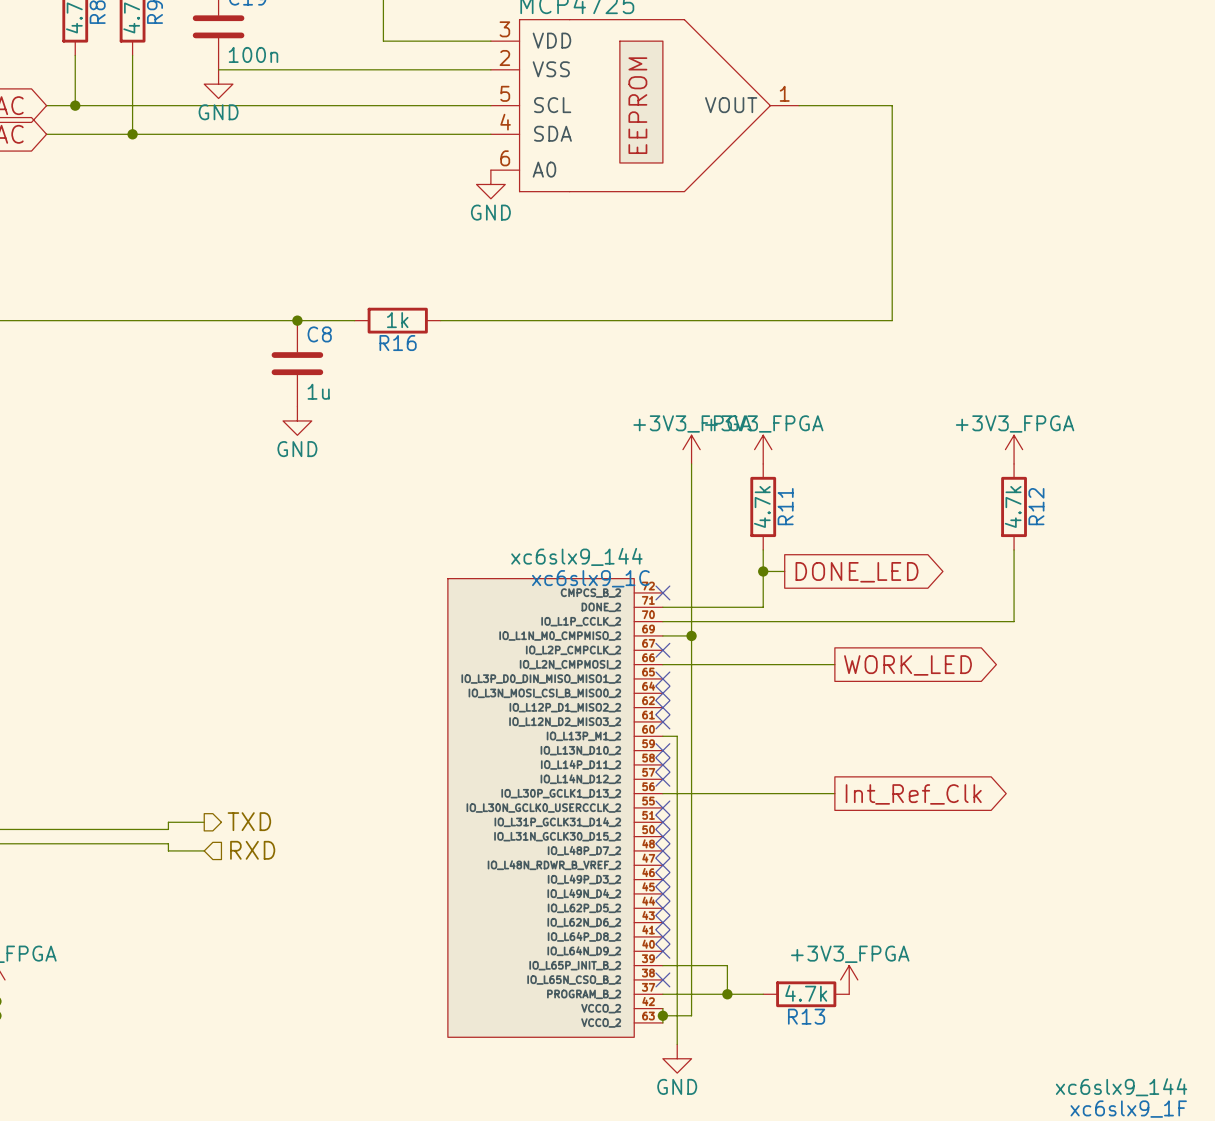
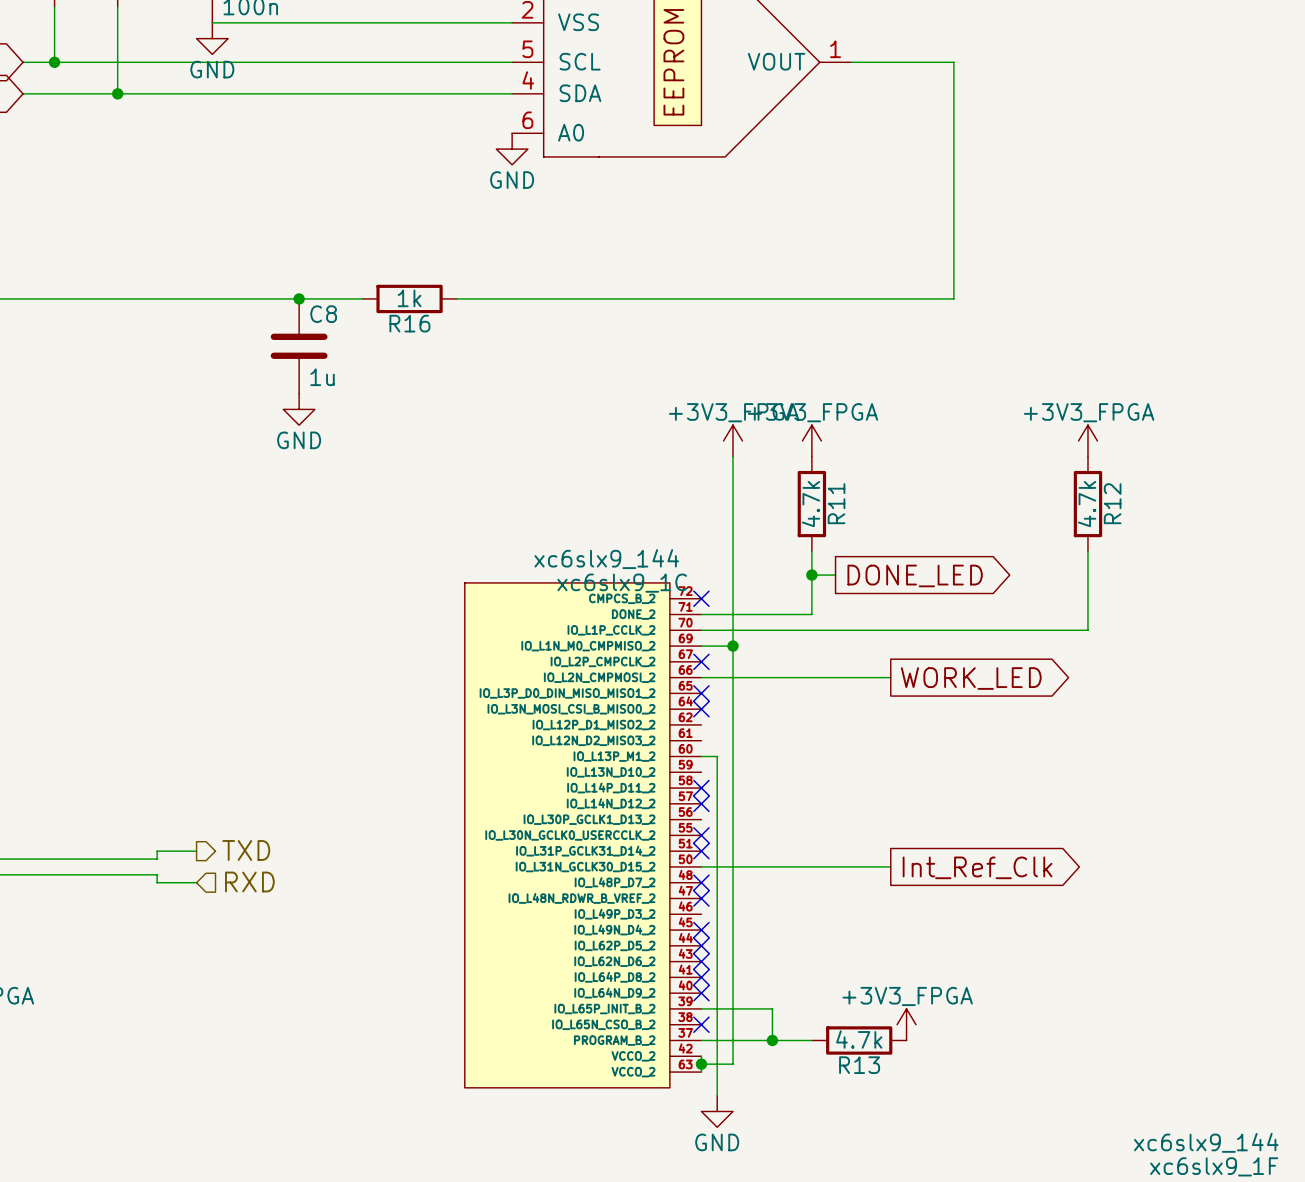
no-connect mark: (662, 707) -> none
no-connect mark: (662, 721) -> none
no-connect mark: (662, 750) -> none
wire: (662, 793) (834, 793) -> (701, 866) (890, 866)
global label position: Int_Ref_Clk (913, 794) -> Int_Ref_Clk (977, 867)
no-connect mark: (662, 836) -> none
no-connect mark: (662, 879) -> none

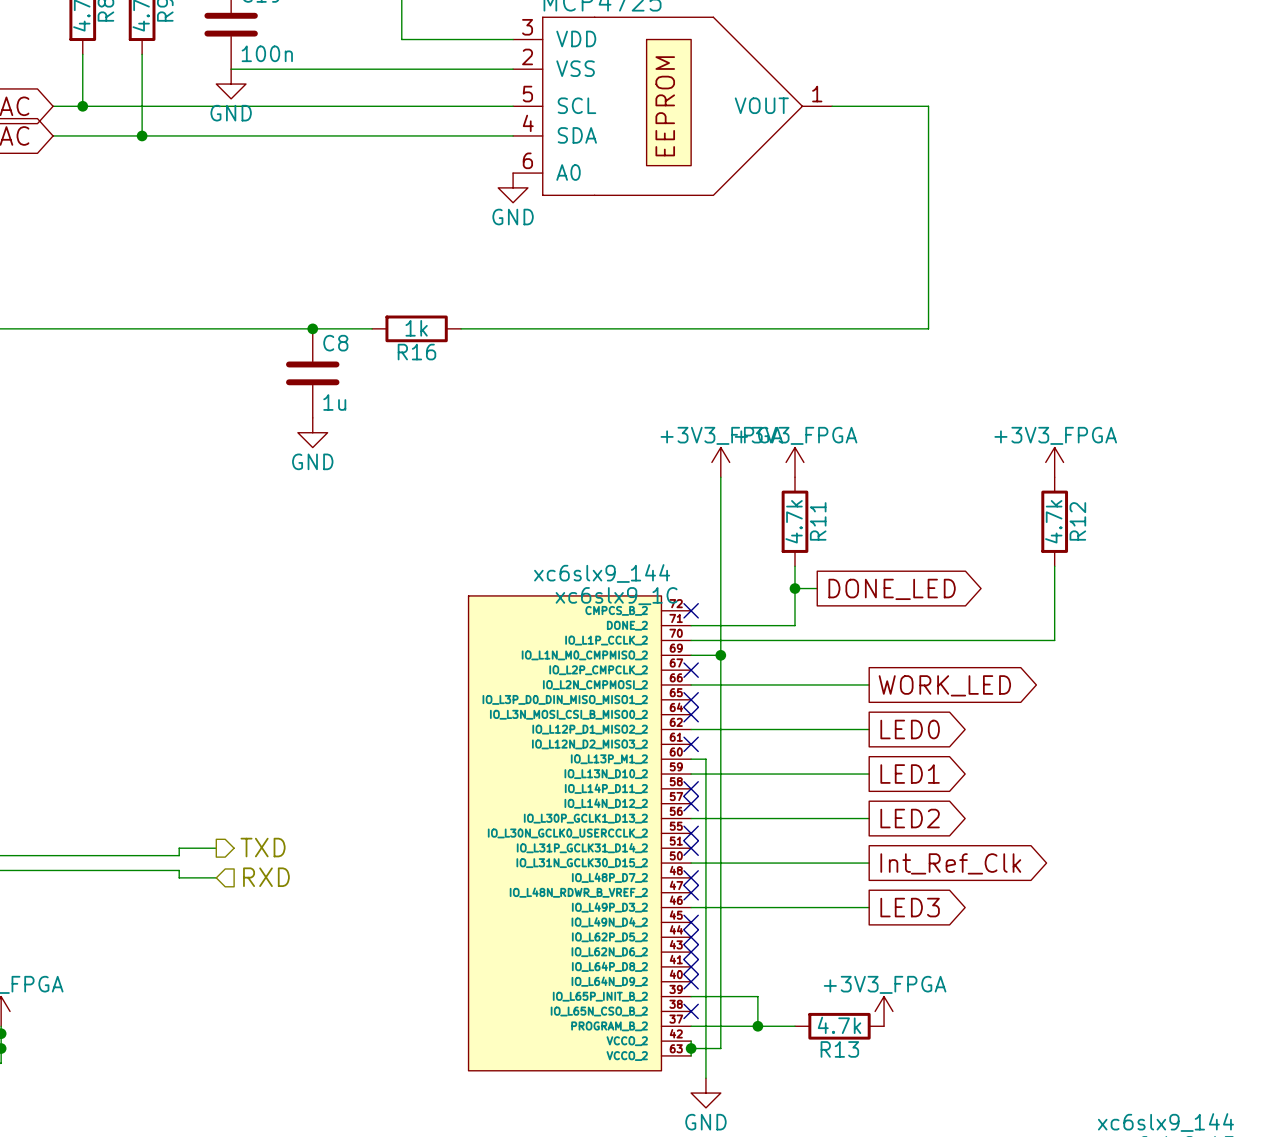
wire: none -> (691, 729) (869, 729)
global label: none -> LED0 (910, 729)
no-connect mark: none -> (691, 744)
wire: none -> (691, 774) (869, 774)
global label: none -> LED1 (910, 774)
wire: none -> (691, 818) (869, 818)
global label: none -> LED2 (910, 818)
wire: none -> (691, 907) (869, 907)
global label: none -> LED3 (910, 907)

